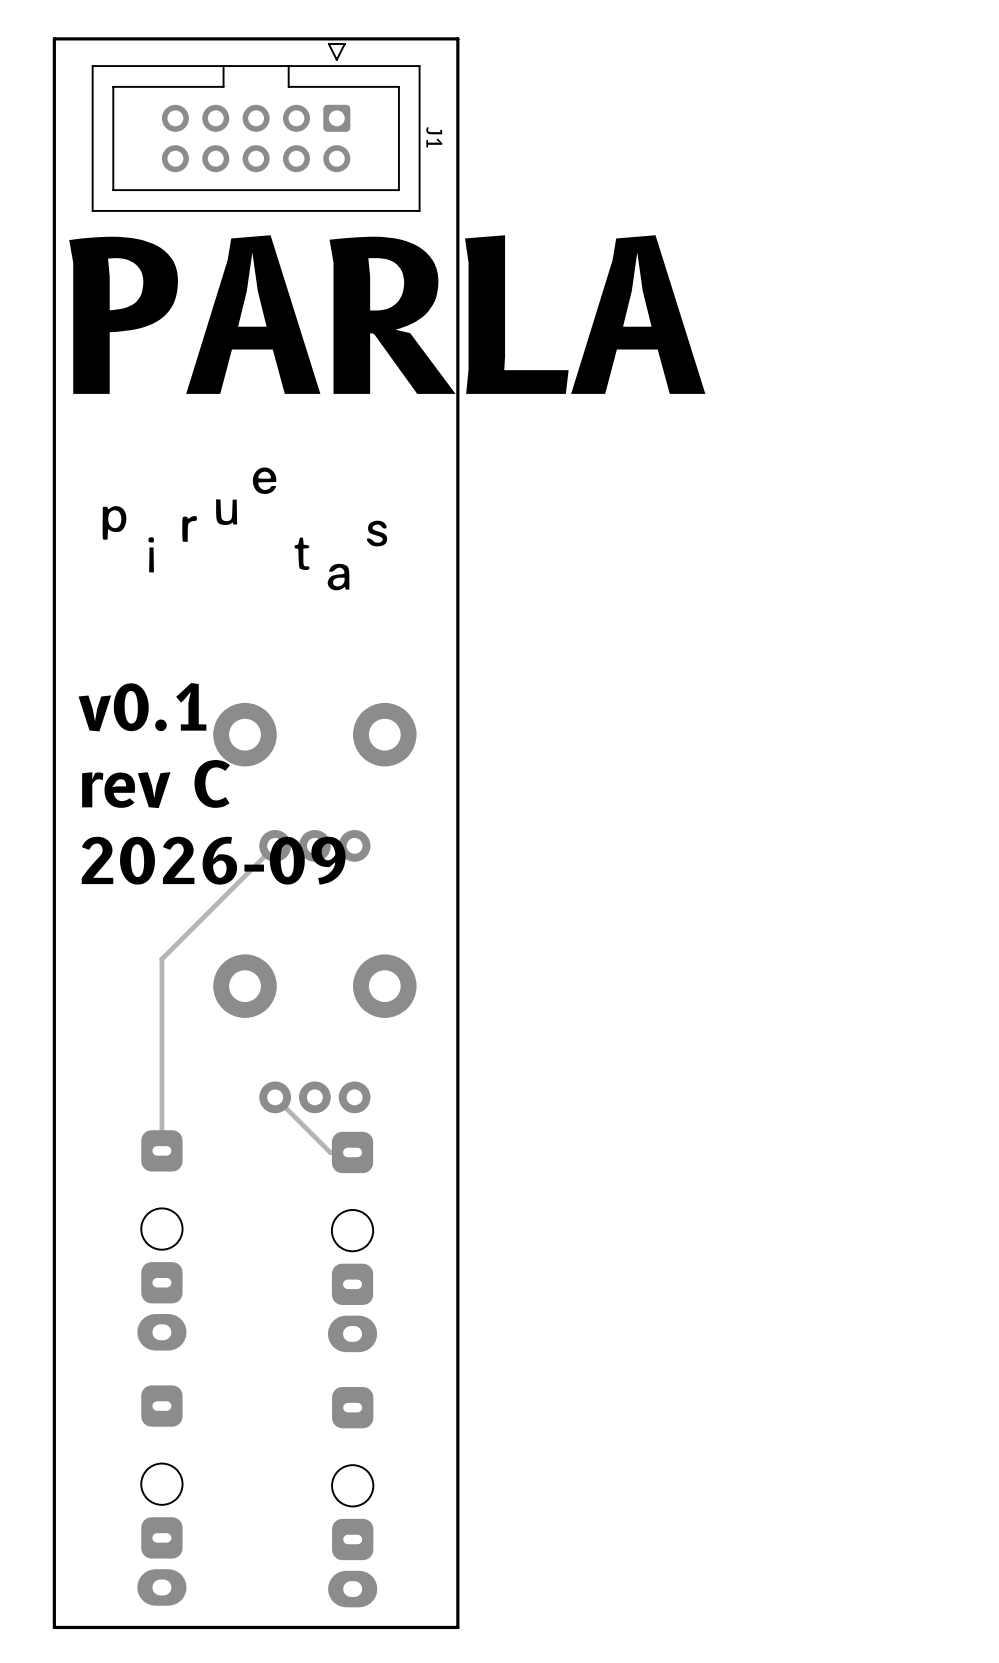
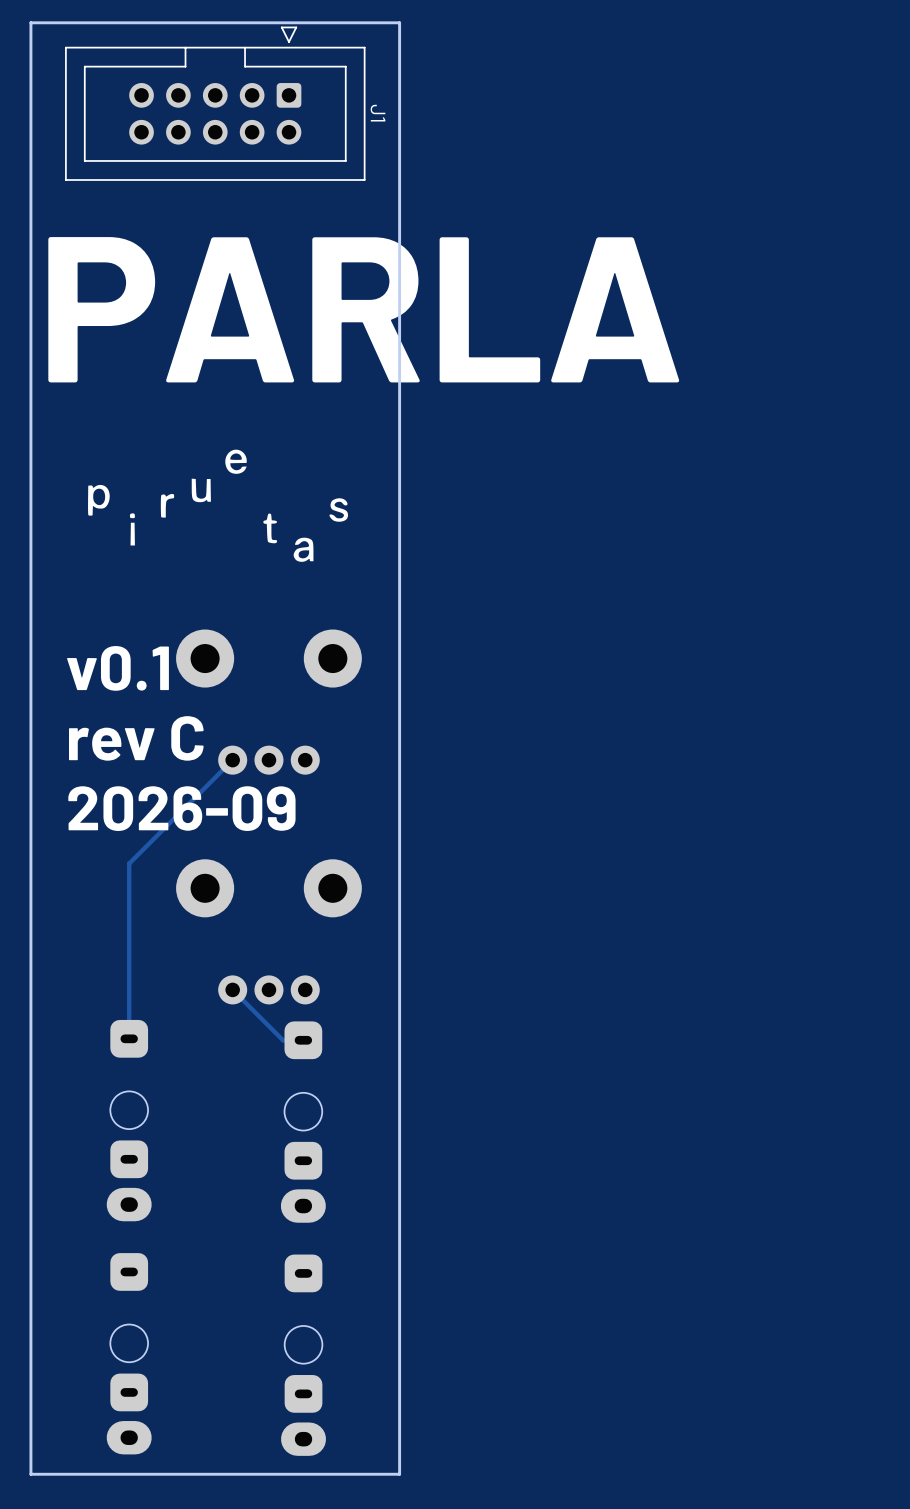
text position: PARLA (387, 314) -> PARLA (363, 309)
drawing position: (264, 480) -> (236, 461)
drawing position: (226, 512) -> (201, 490)
drawing position: (114, 522) -> (98, 500)
drawing position: (189, 528) -> (167, 505)
drawing position: (377, 533) -> (338, 510)
drawing position: (151, 539) -> (132, 515)
drawing position: (301, 553) -> (270, 528)
drawing position: (151, 559) -> (132, 534)
drawing position: (338, 577) -> (303, 549)
text position: v0.1 (142, 707) -> v0.1 (117, 668)
text position: rev C (156, 784) -> rev C (136, 738)
text position: 2026-09 (213, 860) -> 2026-09 (181, 808)

